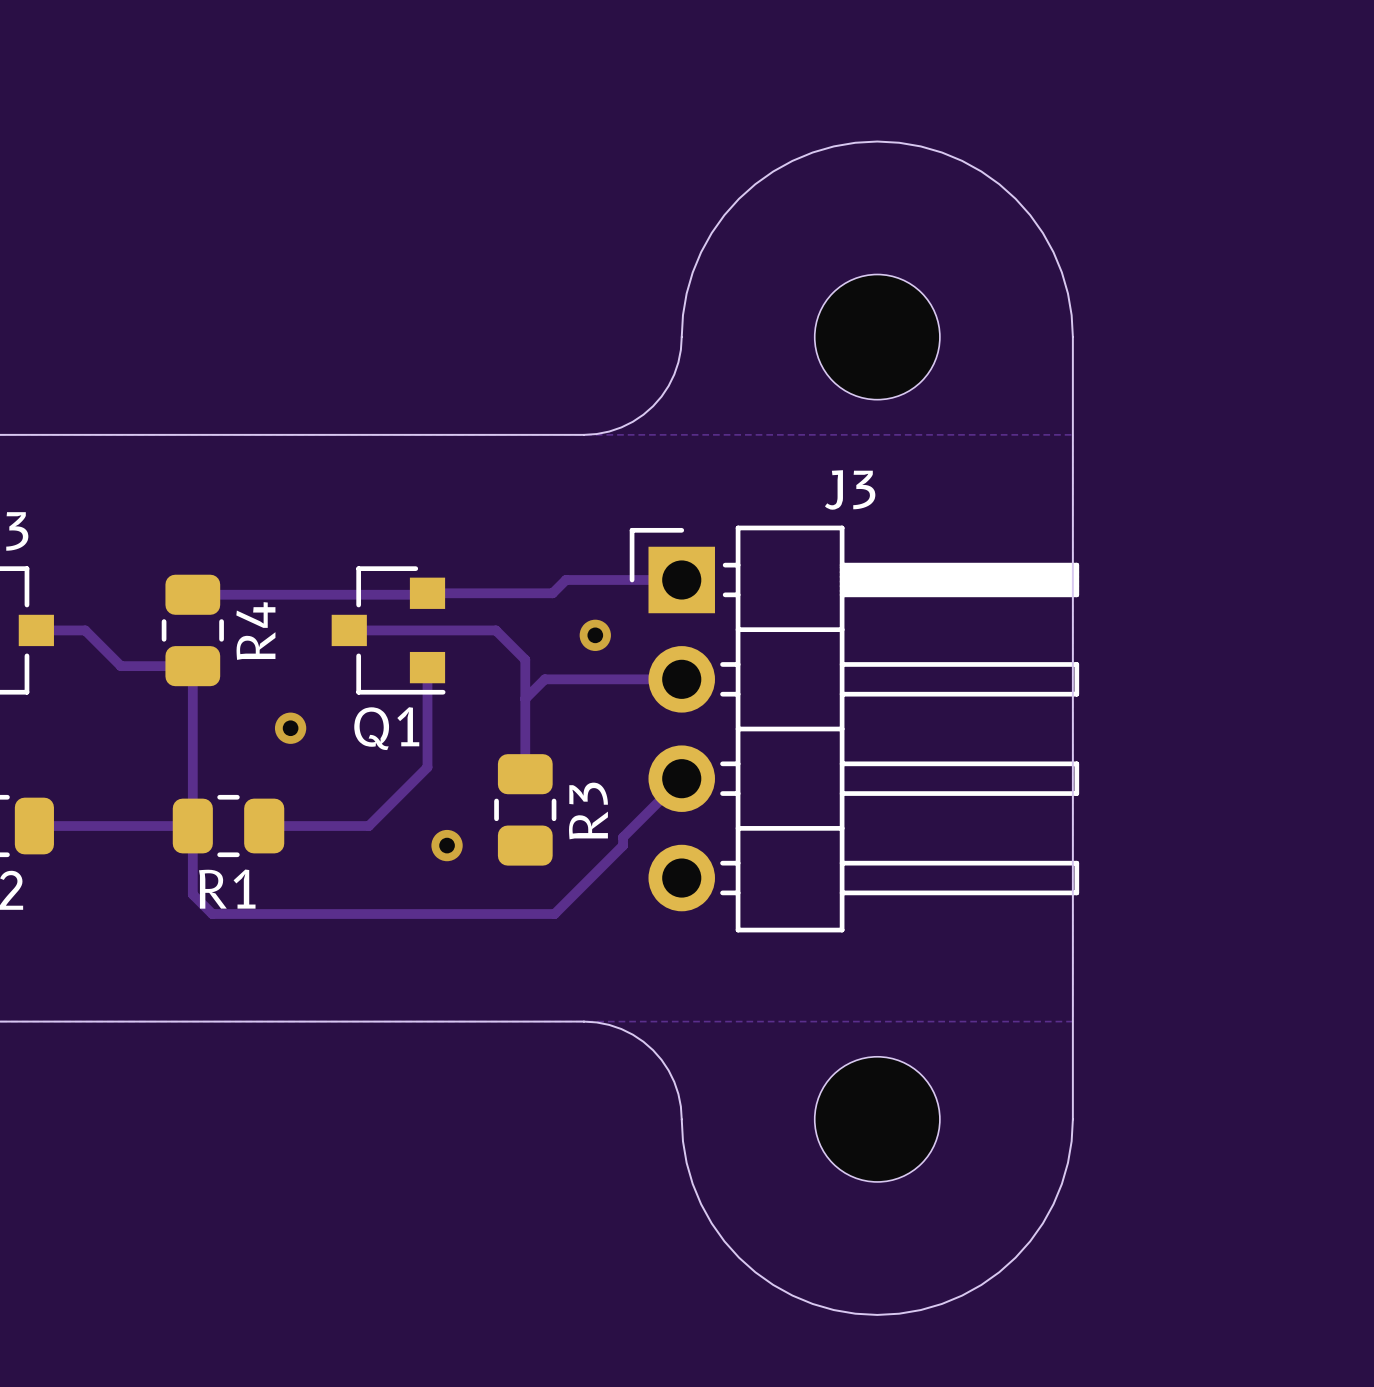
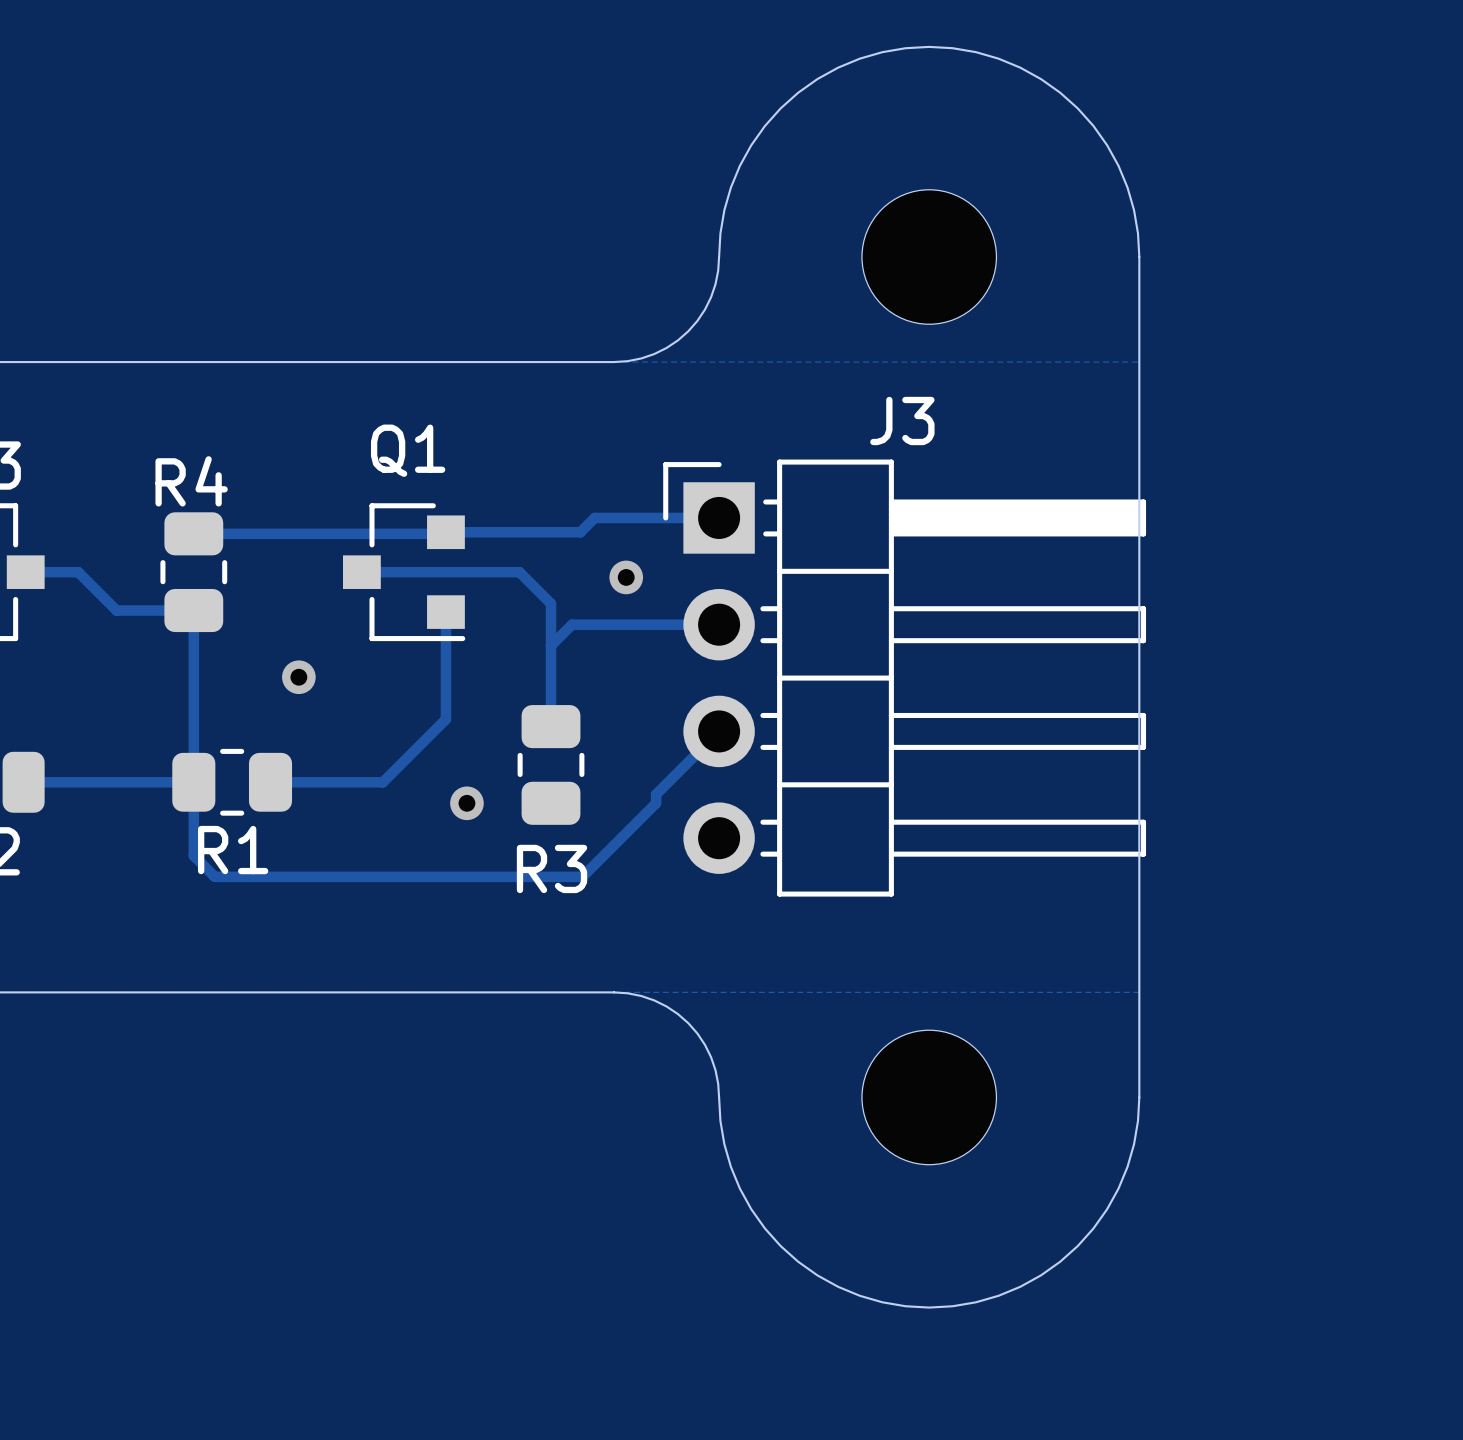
R4 name rotation: 0° (255, 631) -> 90° clockwise (191, 481)
R4 name position: R4 (255, 631) -> R4 (191, 481)
Q1 name position: Q1 (386, 728) -> Q1 (408, 450)
R3 name rotation: 0° (588, 811) -> 90° clockwise (552, 868)
R3 name position: R3 (588, 811) -> R3 (552, 868)

